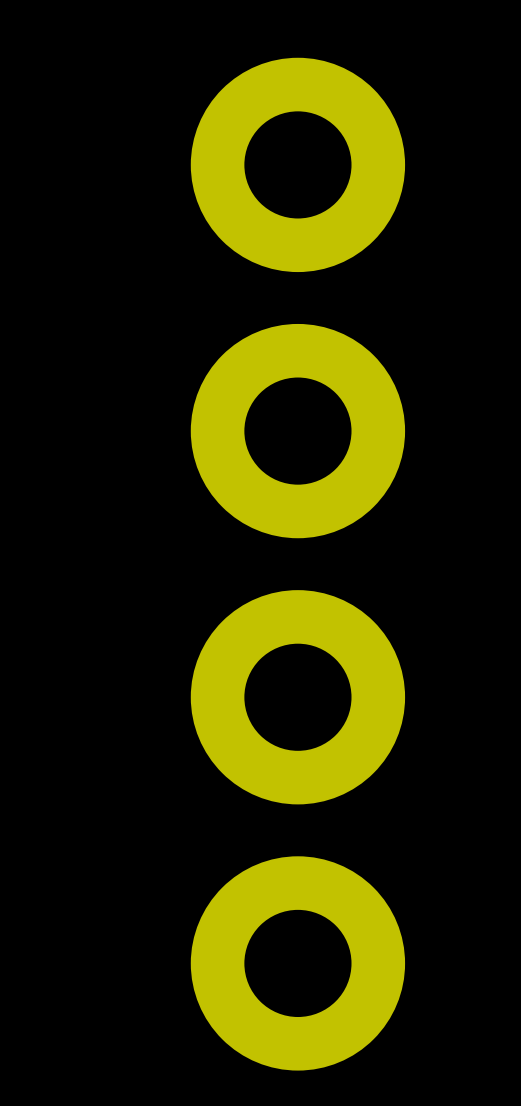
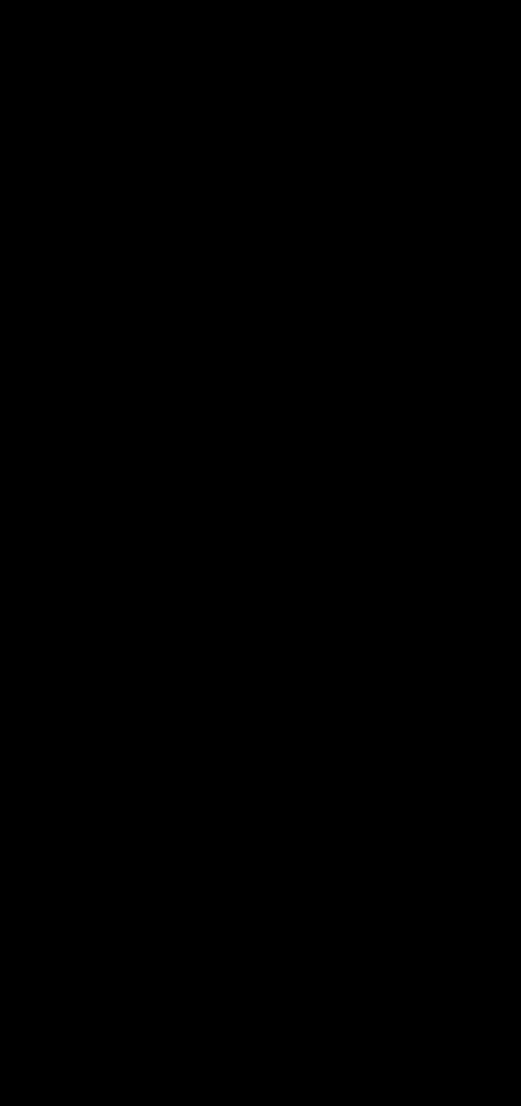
part: (297, 164) -> none
part: (297, 431) -> none
part: (297, 697) -> none
part: (297, 963) -> none

